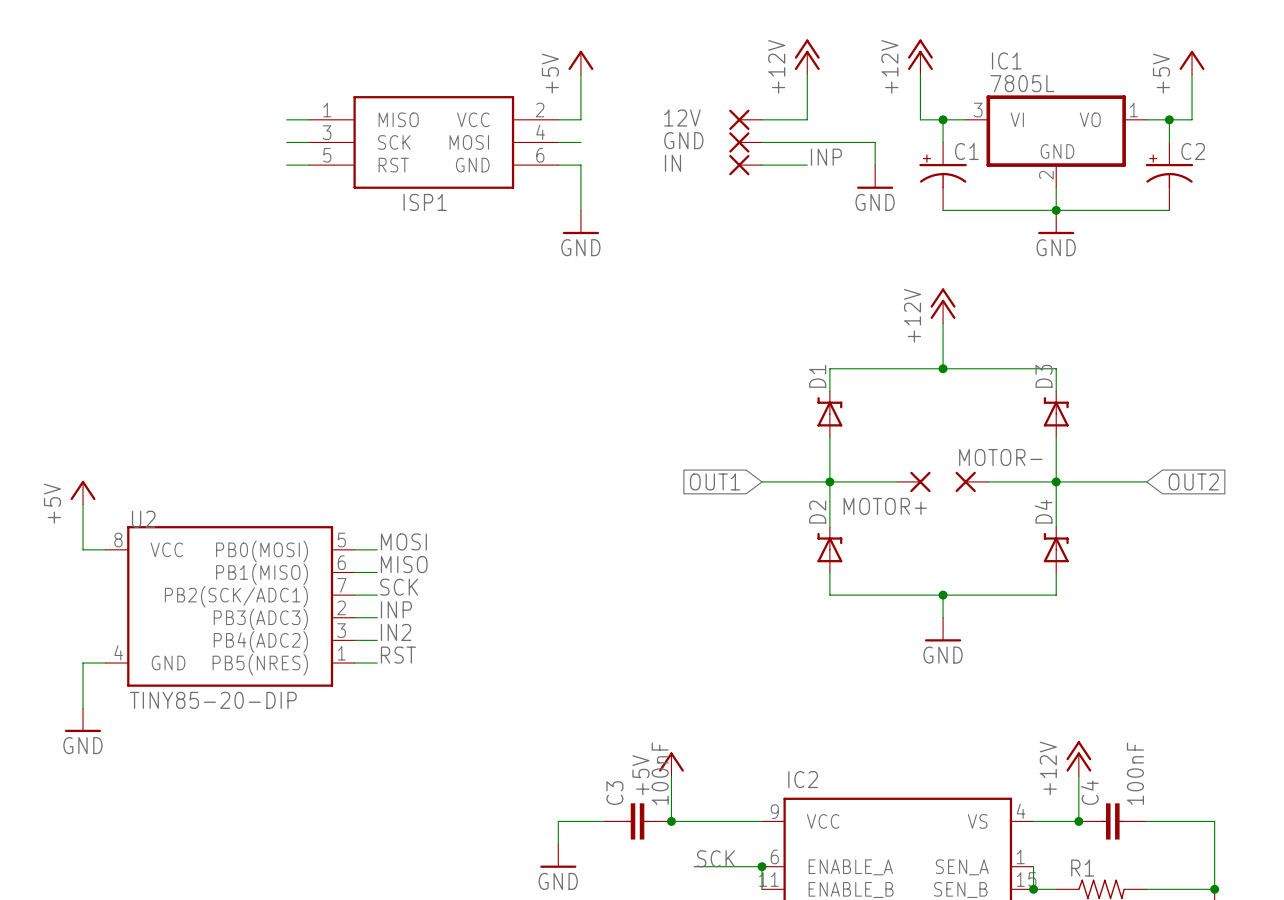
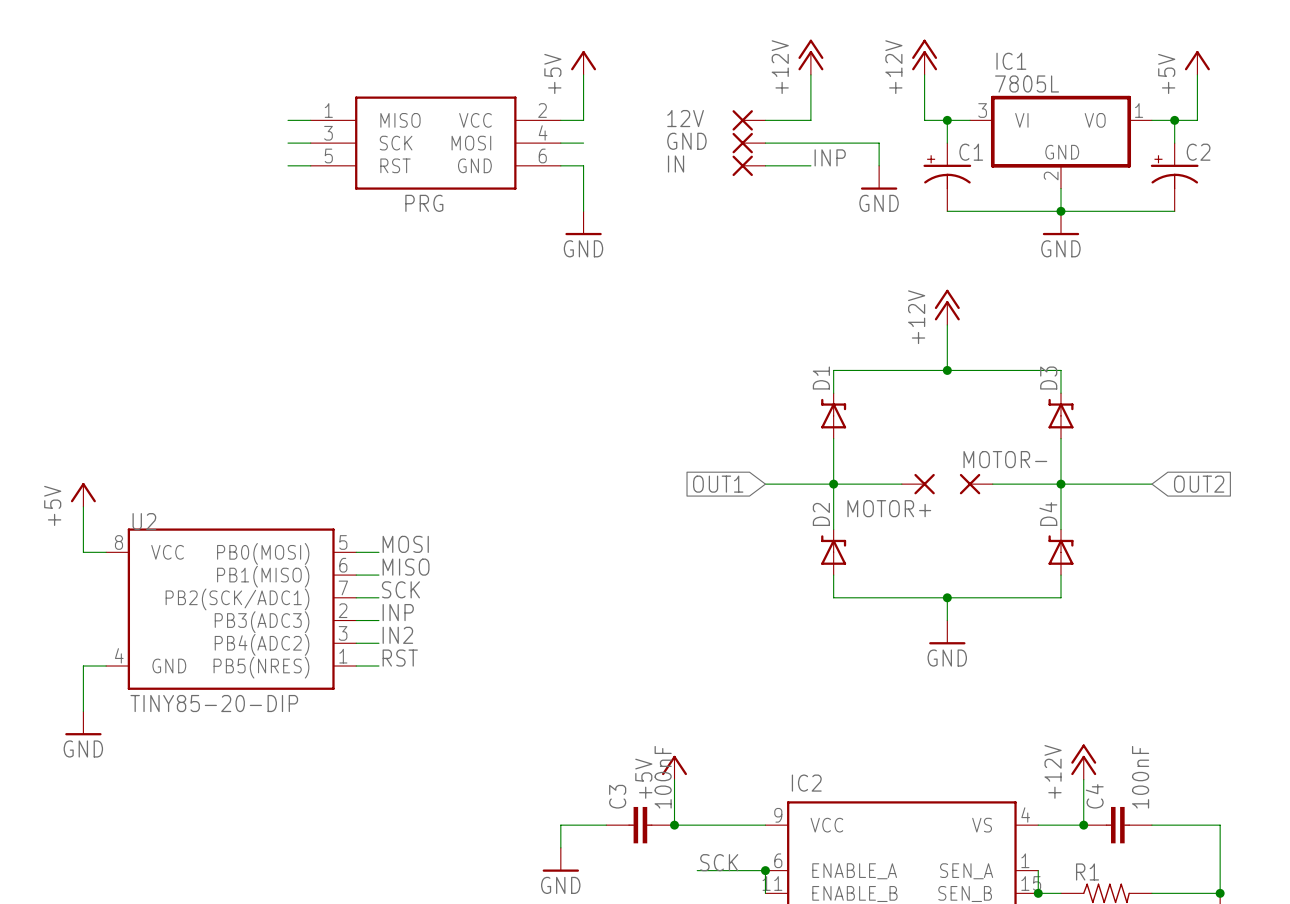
ISP1 name: ISP1 (425, 202) -> PRG (424, 203)

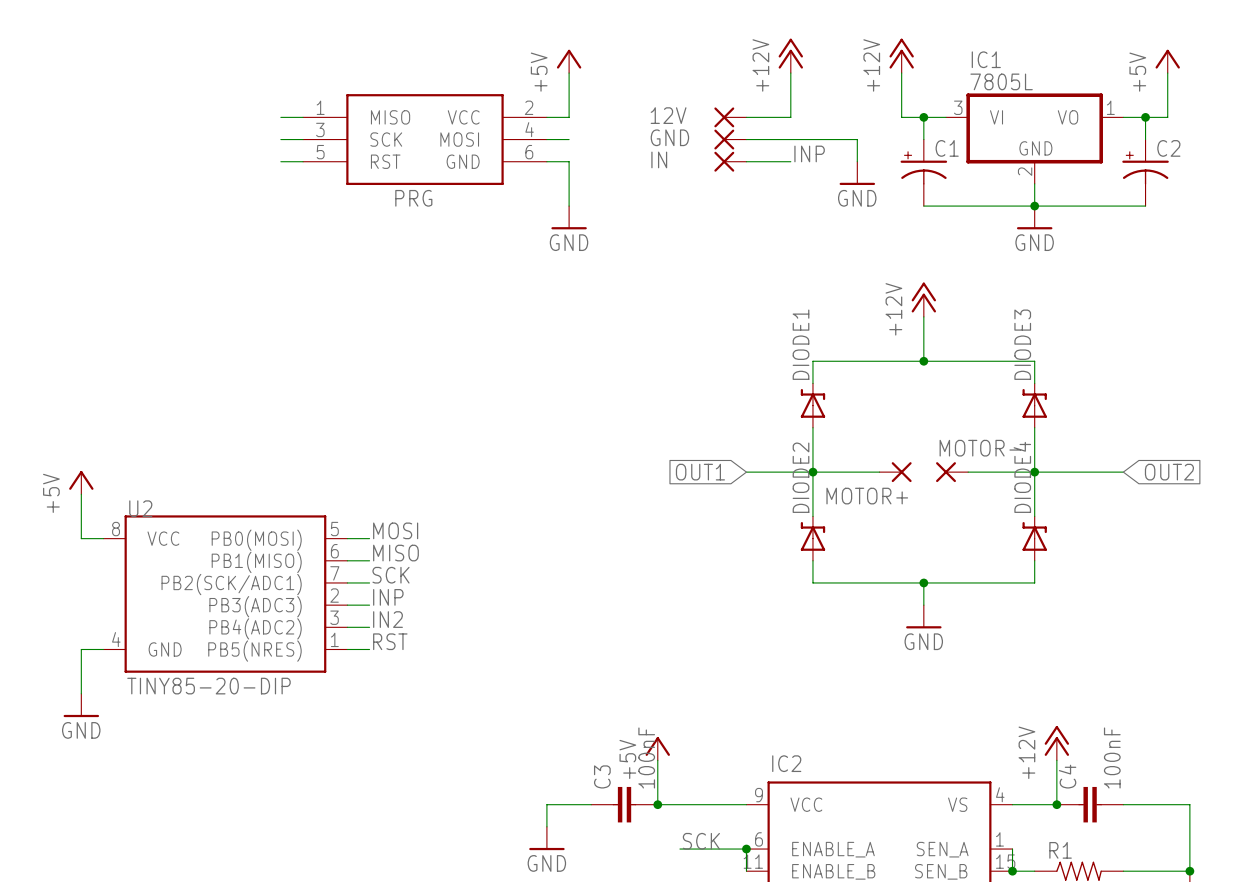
D1 name: D1 (821, 378) -> DIODE1 (801, 344)
D3 name: D3 (1048, 378) -> DIODE3 (1022, 344)
D2 name: D2 (821, 514) -> DIODE2 (801, 477)
D4 name: D4 (1048, 514) -> DIODE4 (1022, 477)

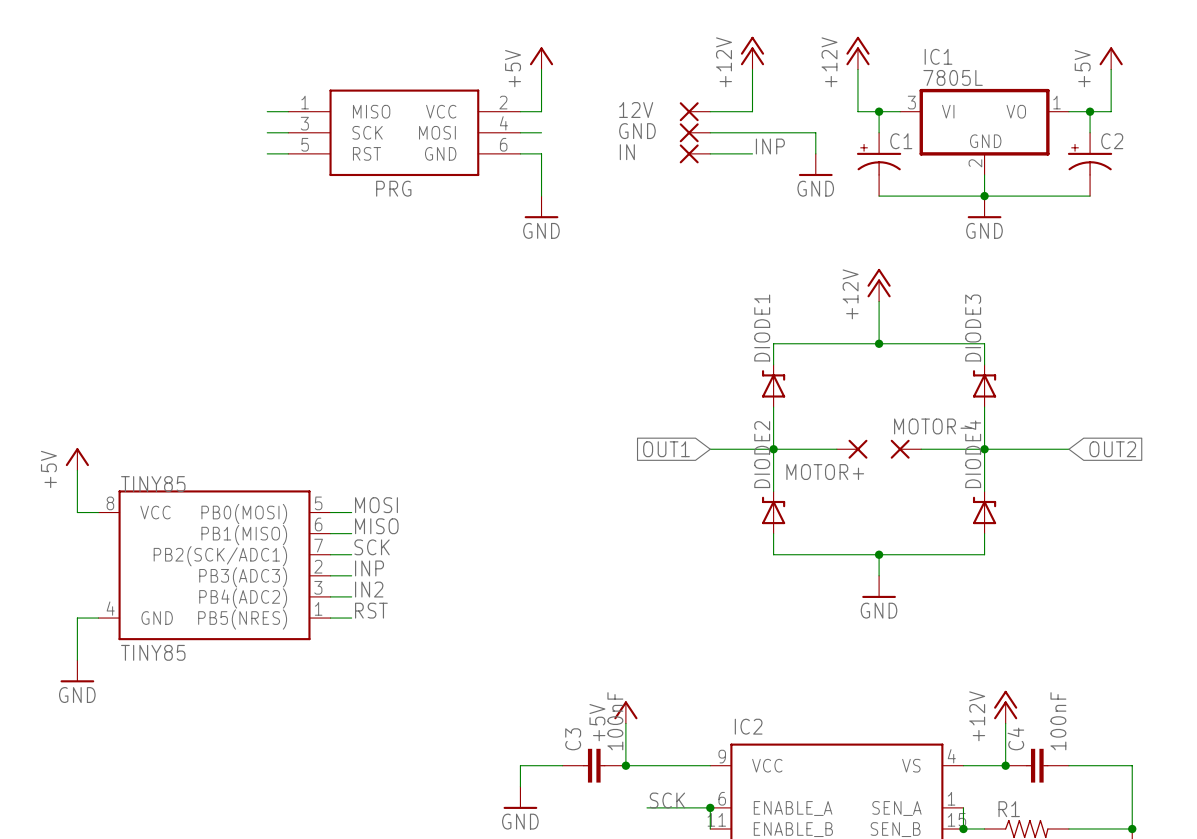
U2 name: U2 (140, 508) -> TINY85 (153, 484)
U2 value: TINY85-20-DIP (208, 686) -> TINY85 (153, 652)

